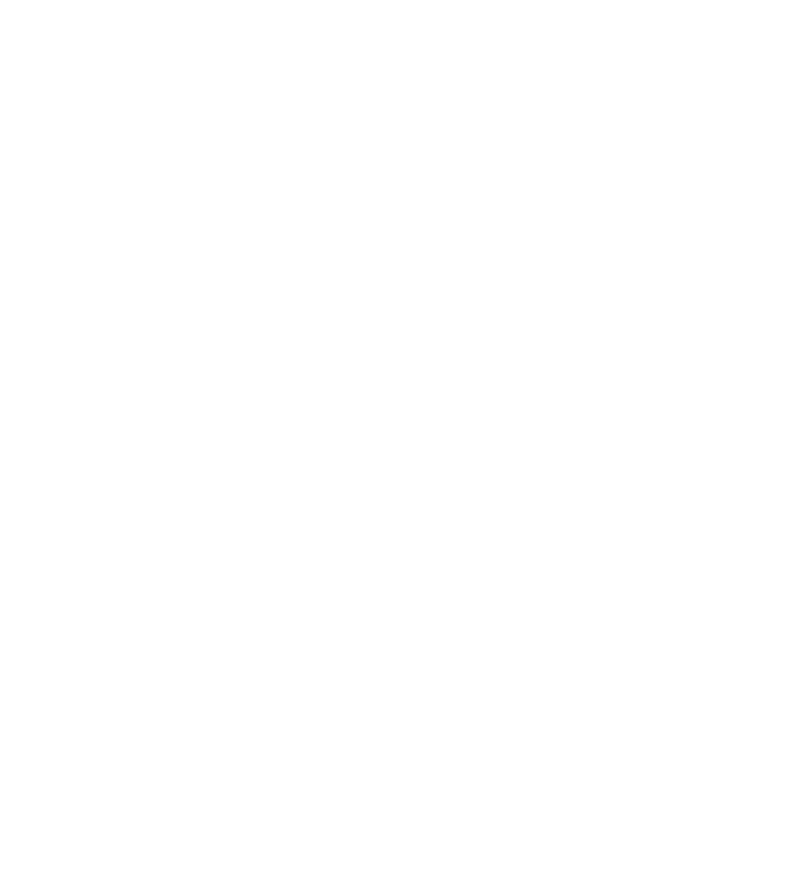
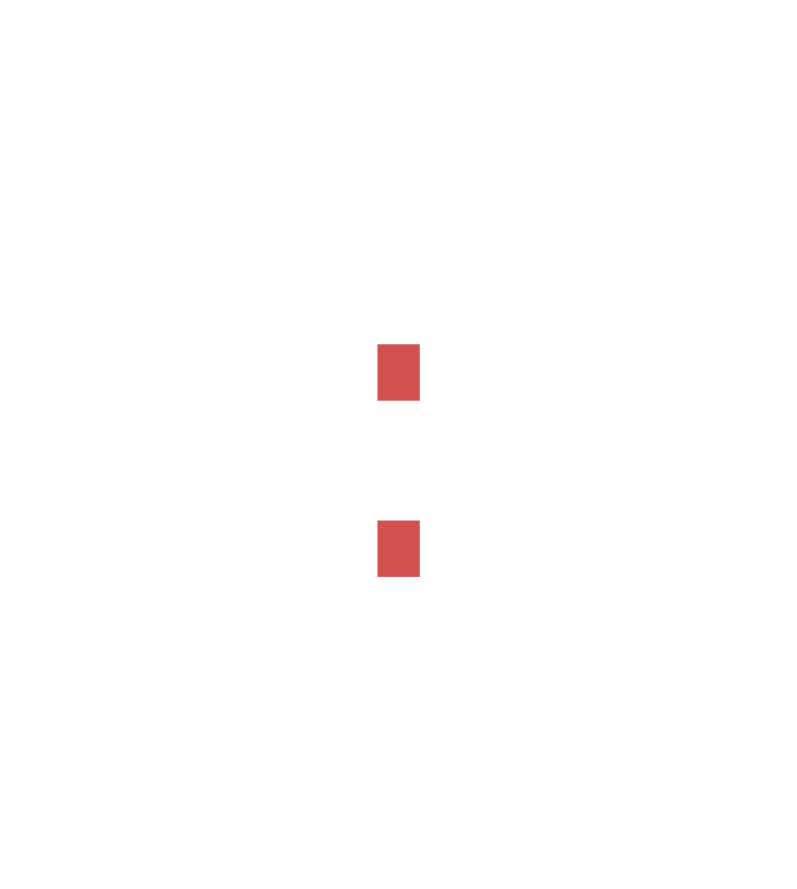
part: none -> (398, 460)

